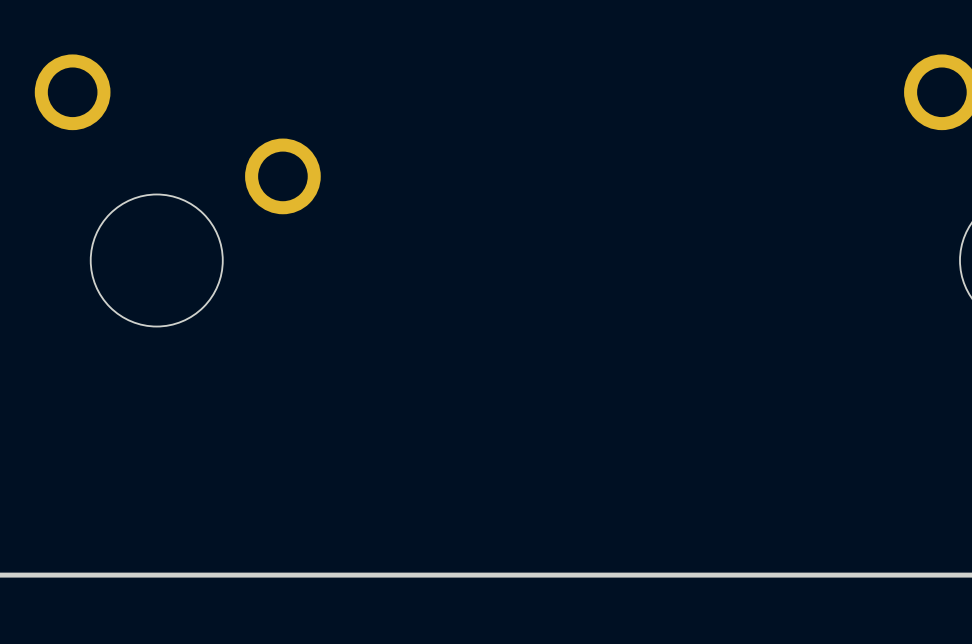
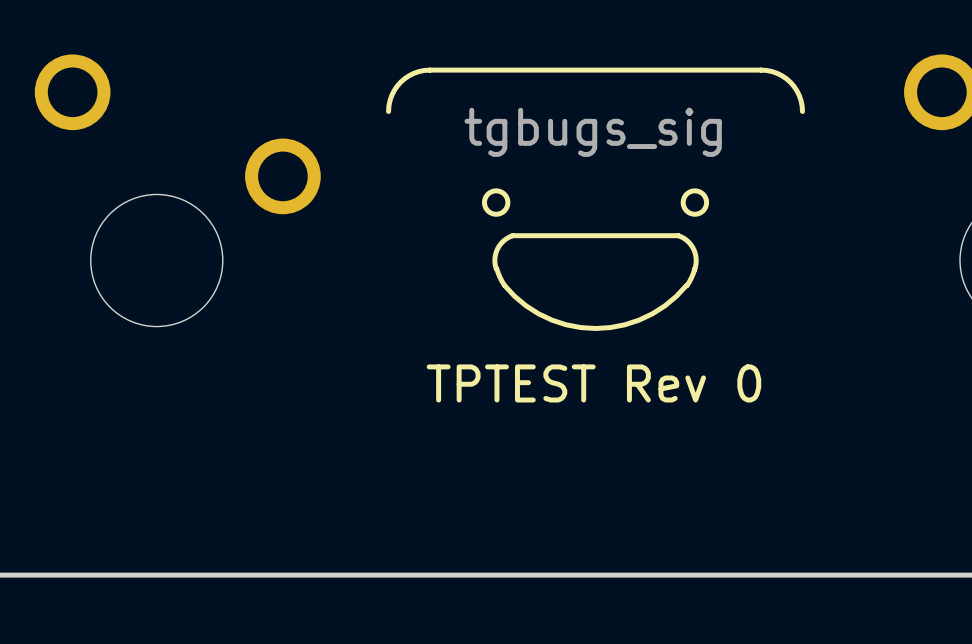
TPTEST Rev 0: none -> tgbugs_sig (595, 199)

